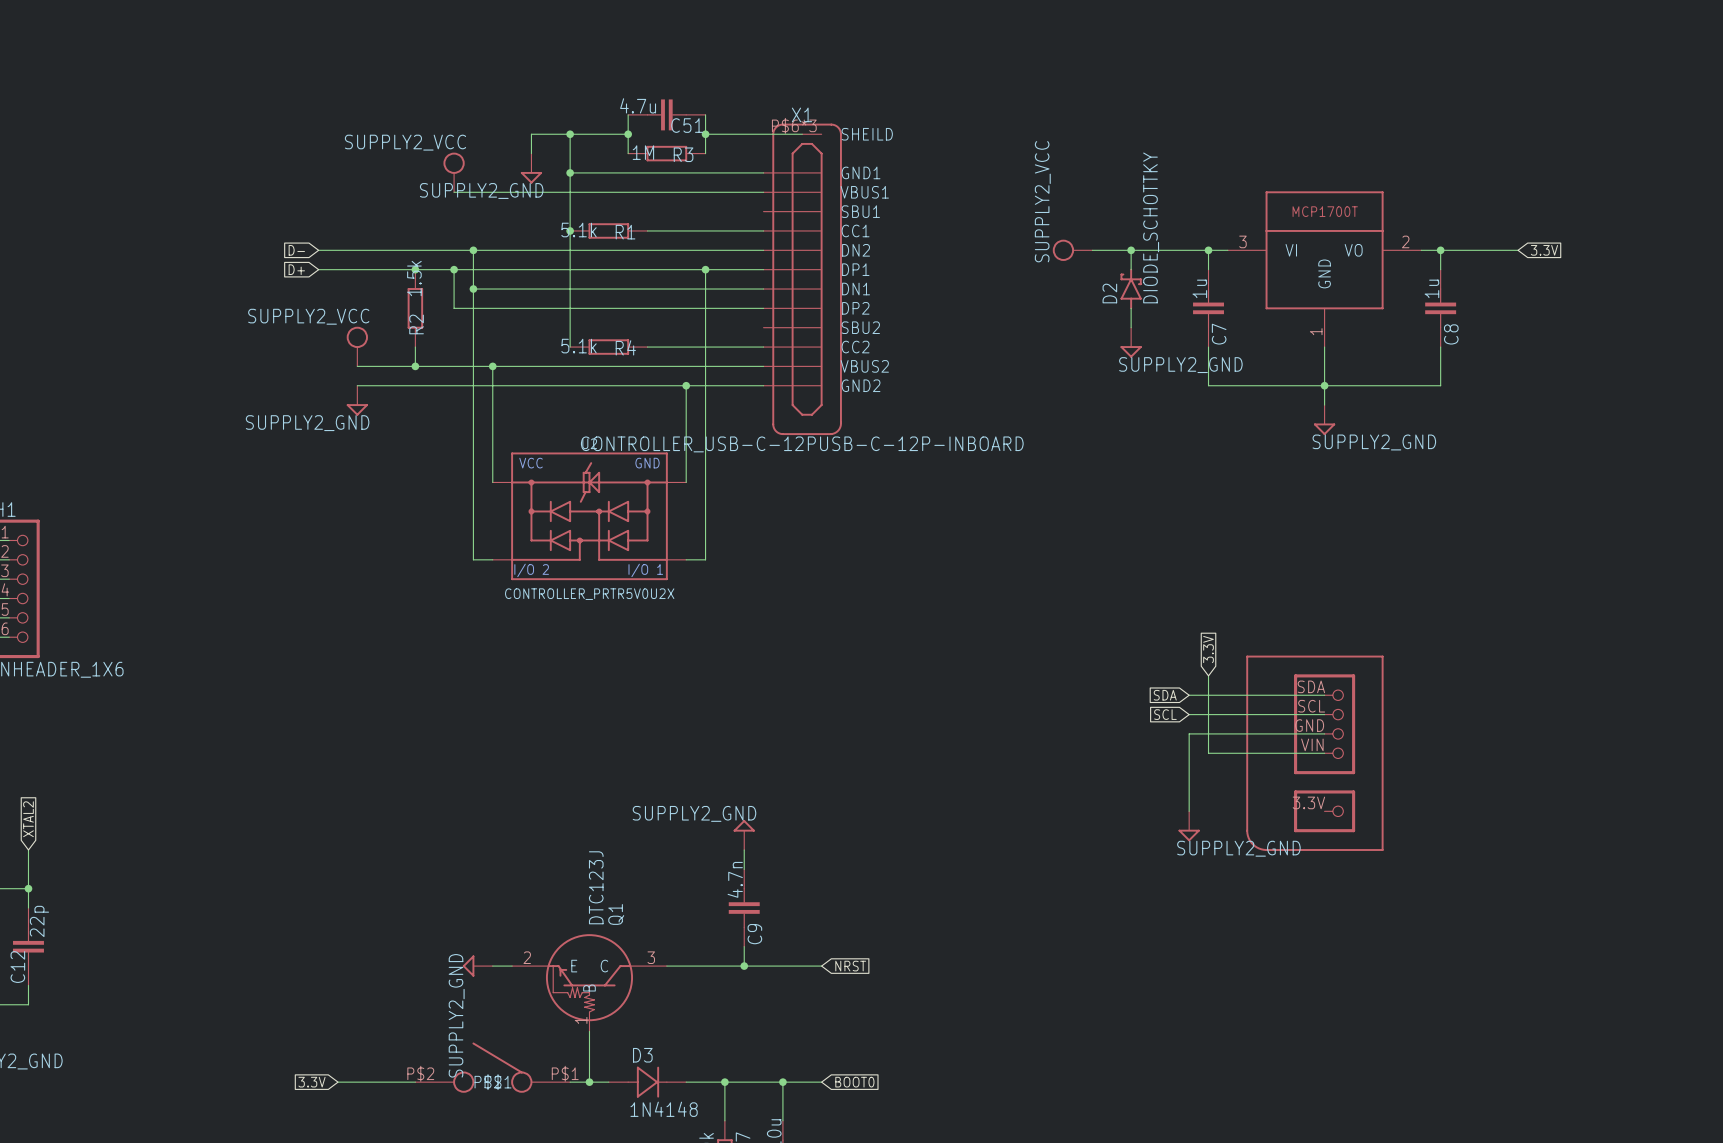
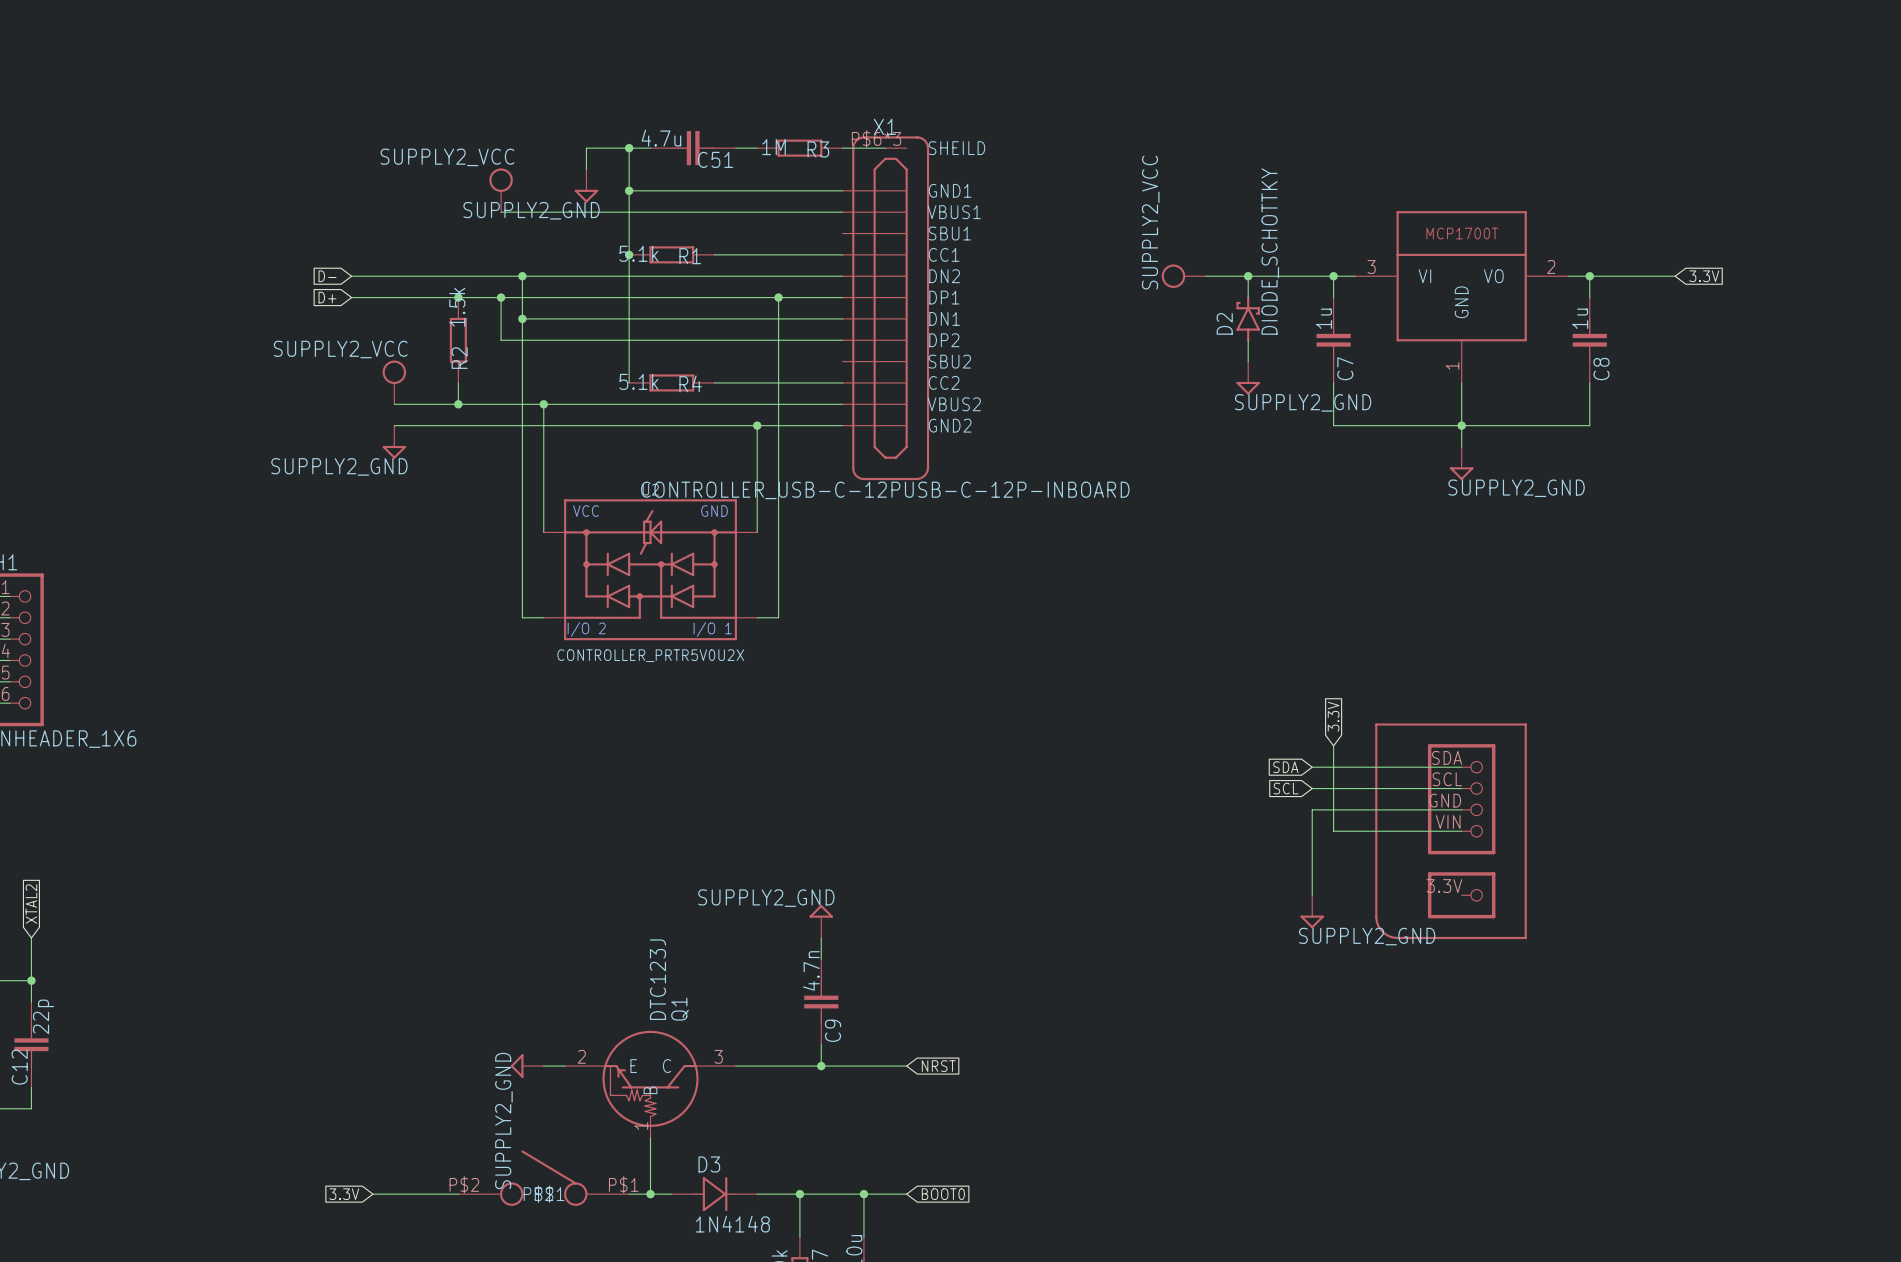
wire: (628, 114) (628, 153) -> none
C51 position: (666, 114) -> (693, 148)
wire: (705, 114) (705, 153) -> none
junction: (628, 134) -> none
wire: none -> (735, 148) (757, 148)
wire: (705, 134) (763, 134) -> none
junction: (705, 134) -> none
R3 position: (666, 153) -> (799, 148)

